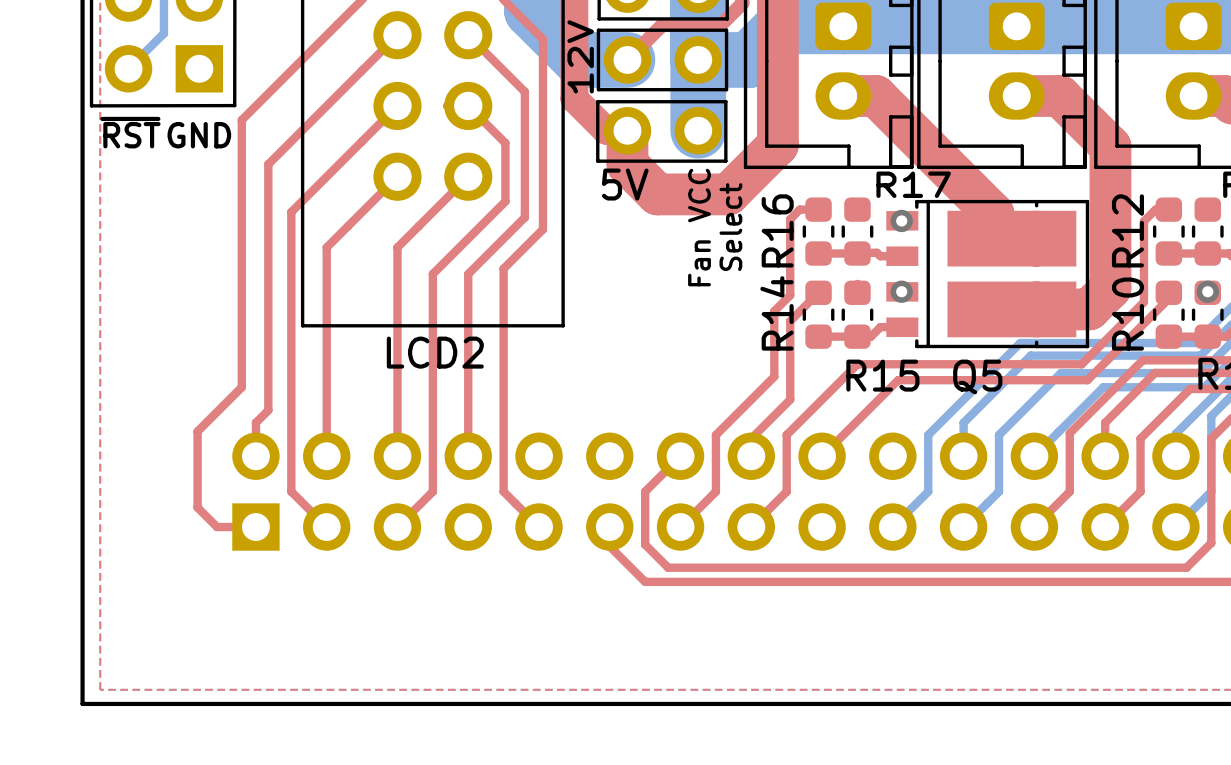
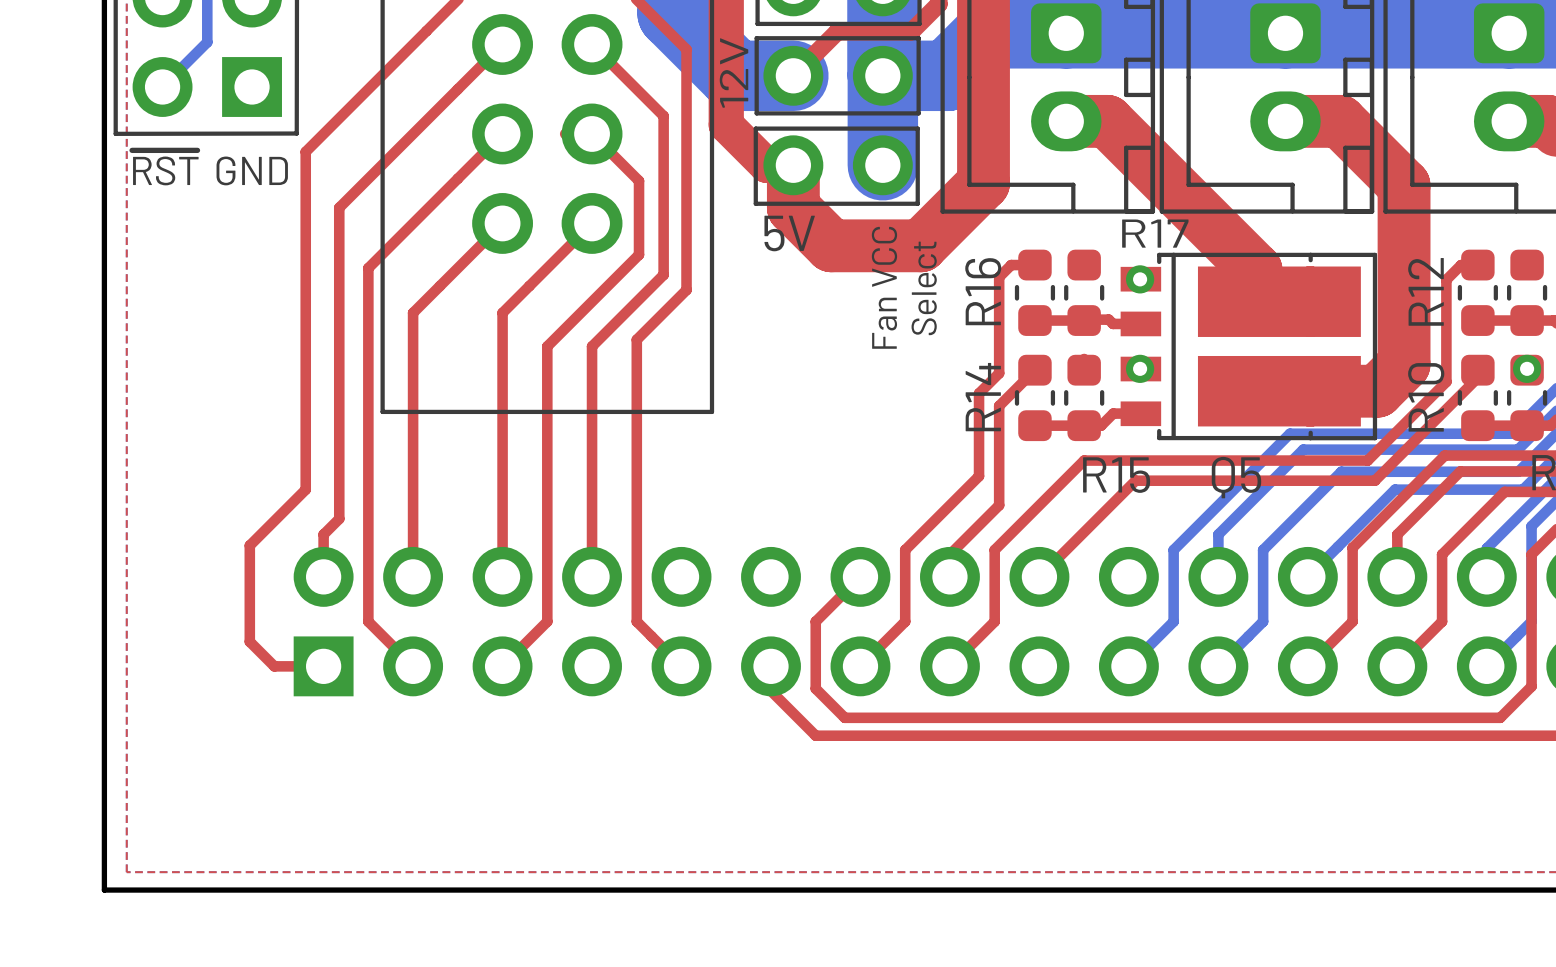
text: LCD2 (435, 352) -> none

